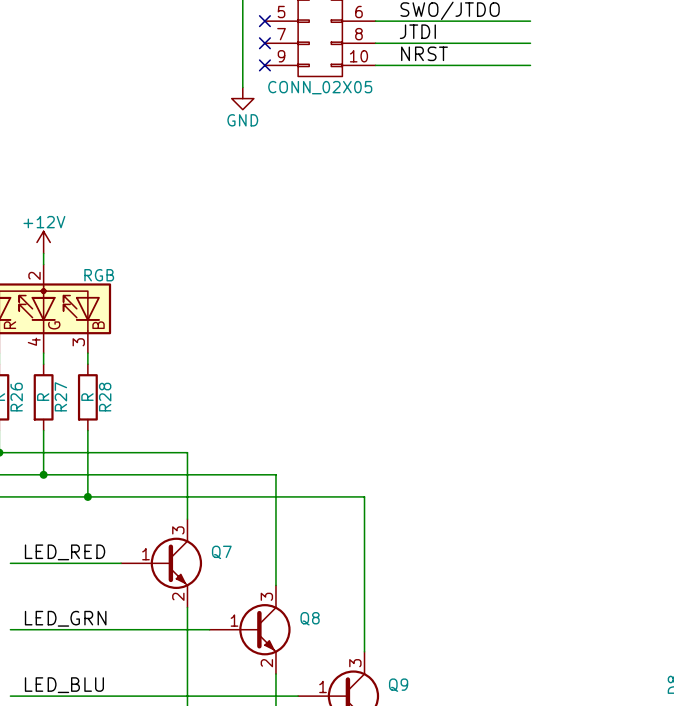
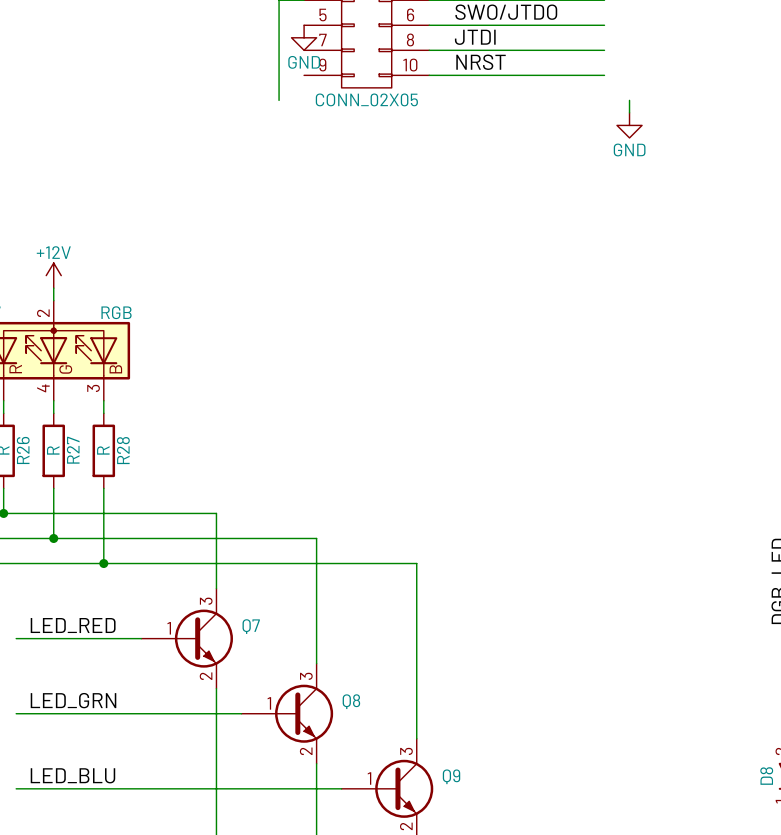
no-connect mark: (264, 21) -> none
no-connect mark: (264, 43) -> none
no-connect mark: (264, 65) -> none
wire: none -> (629, 100) (629, 112)
power symbol position: GND (242, 98) -> GND (304, 37)
power symbol: none -> GND (629, 125)

